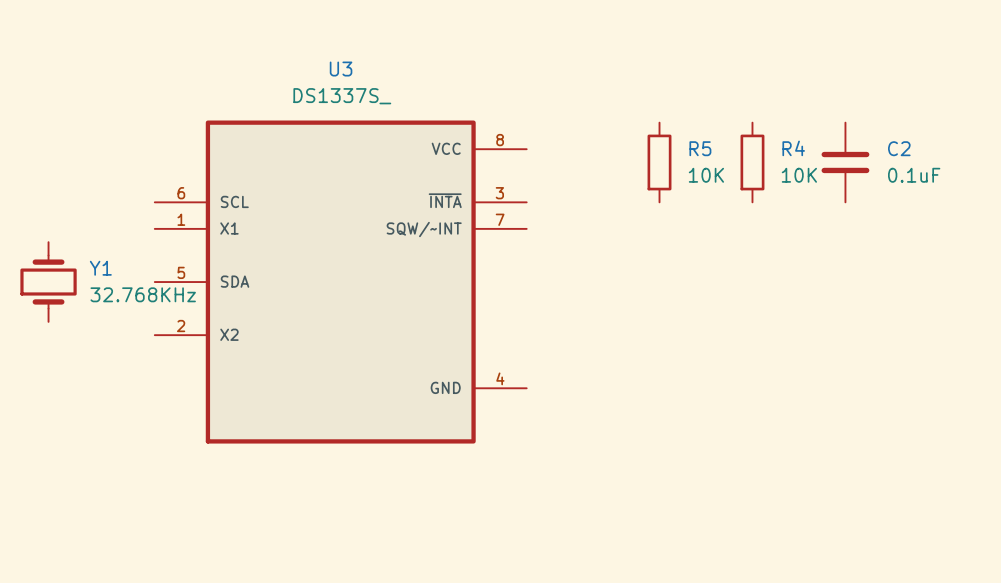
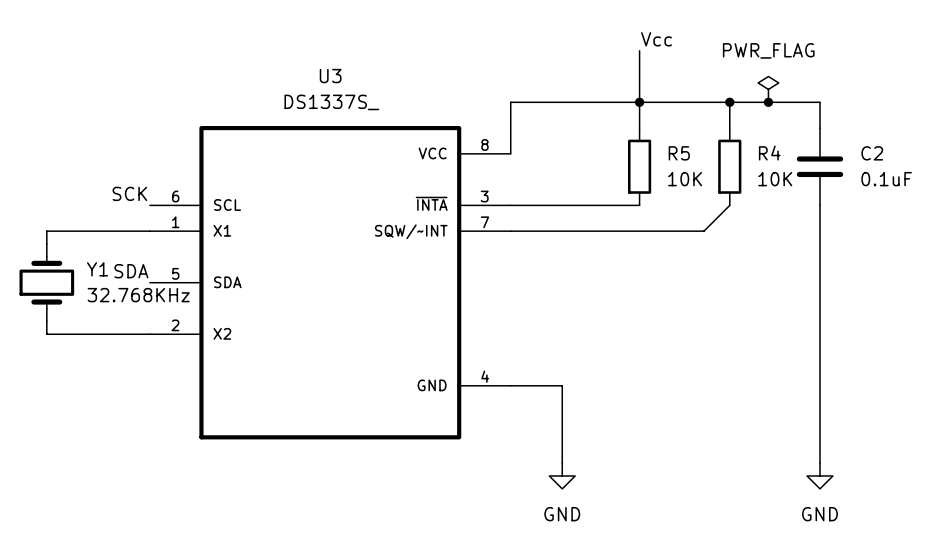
label: none -> Vcc (656, 39)
wire: none -> (639, 50) (639, 128)
power symbol: none -> PWR_FLAG (768, 89)
junction: none -> (639, 102)
wire: none -> (729, 102) (729, 128)
junction: none -> (729, 102)
junction: none -> (768, 102)
wire: none -> (819, 128) (819, 102) (510, 102) (510, 153)
label: none -> SCK (129, 193)
wire: none -> (510, 205) (639, 205)
wire: none -> (729, 205) (704, 231) (510, 231)
wire: none -> (819, 205) (819, 463)
wire: none -> (149, 231) (46, 231) (46, 244)
label: none -> SDA (131, 271)
wire: none -> (46, 321) (46, 334) (149, 334)
wire: none -> (510, 385) (562, 385) (562, 463)
power symbol: none -> GND (562, 475)
power symbol: none -> GND (819, 475)

